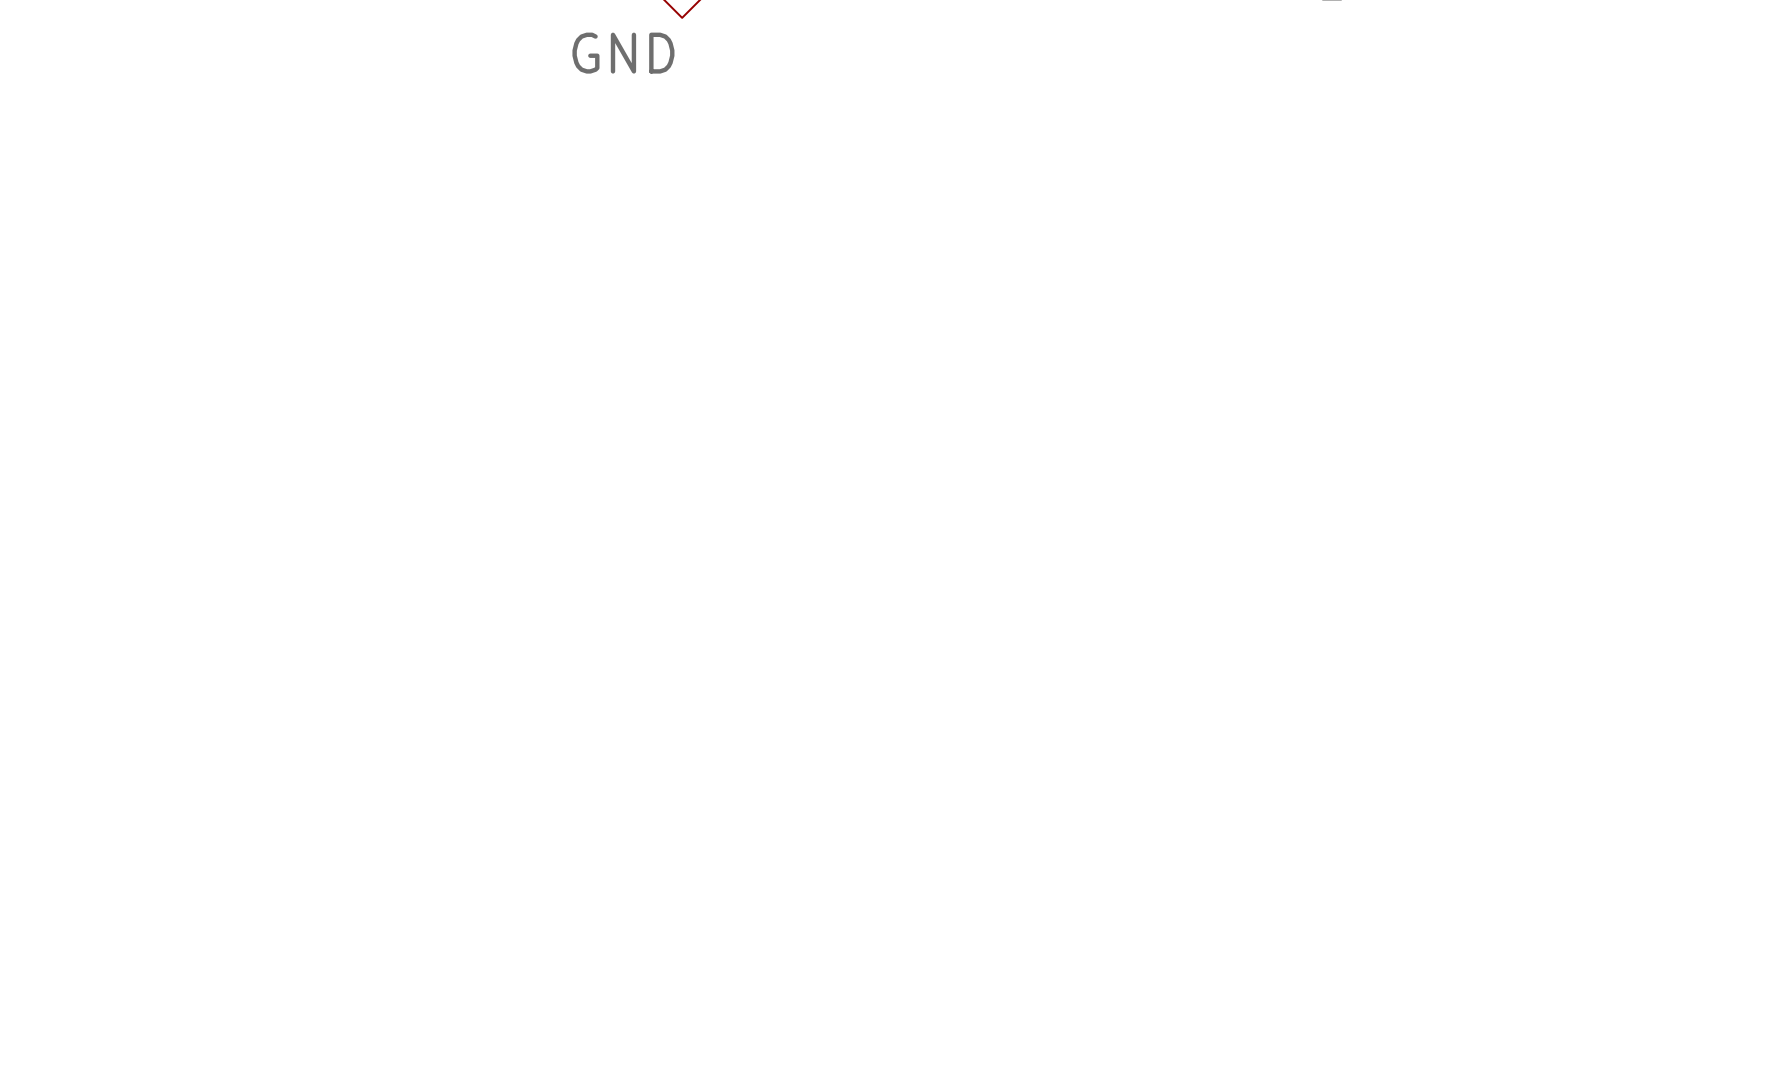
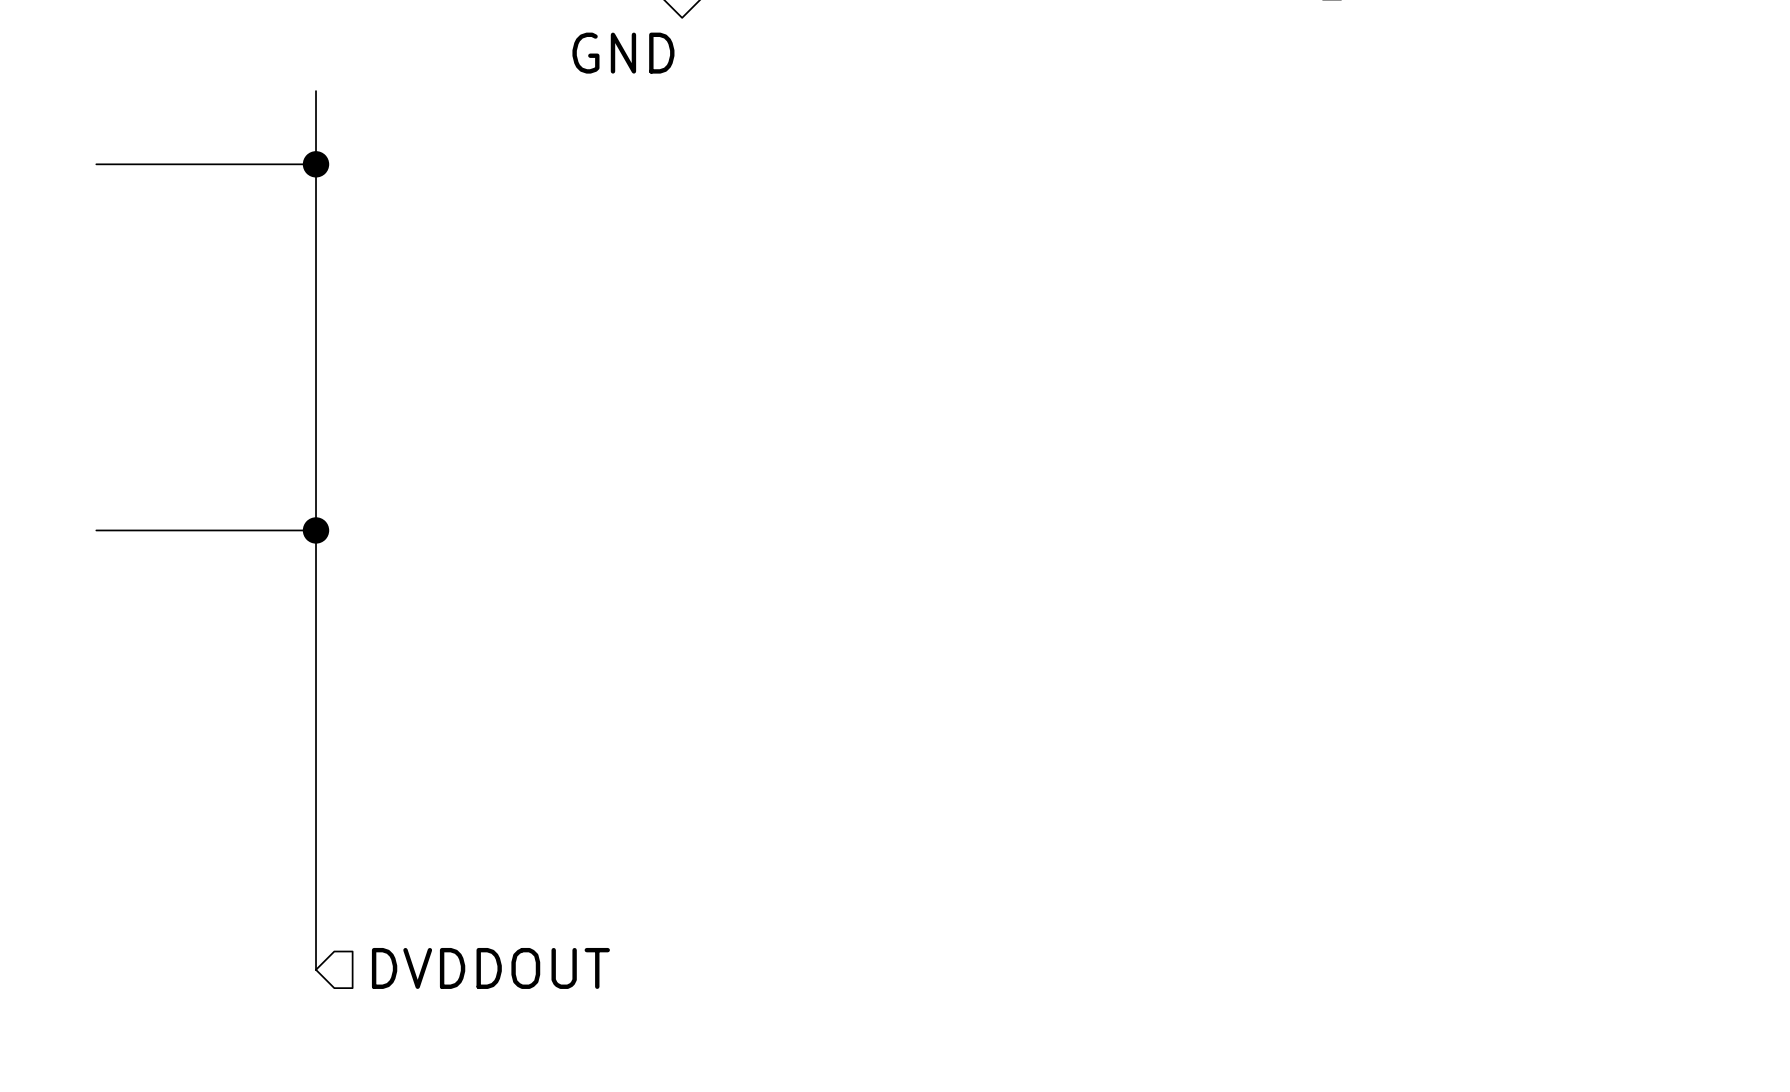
wire: none -> (316, 91) (316, 969)
wire: none -> (96, 164) (316, 164)
junction: none -> (316, 164)
wire: none -> (96, 530) (316, 530)
junction: none -> (316, 530)
hierarchical label: none -> DVDDOUT (490, 968)

